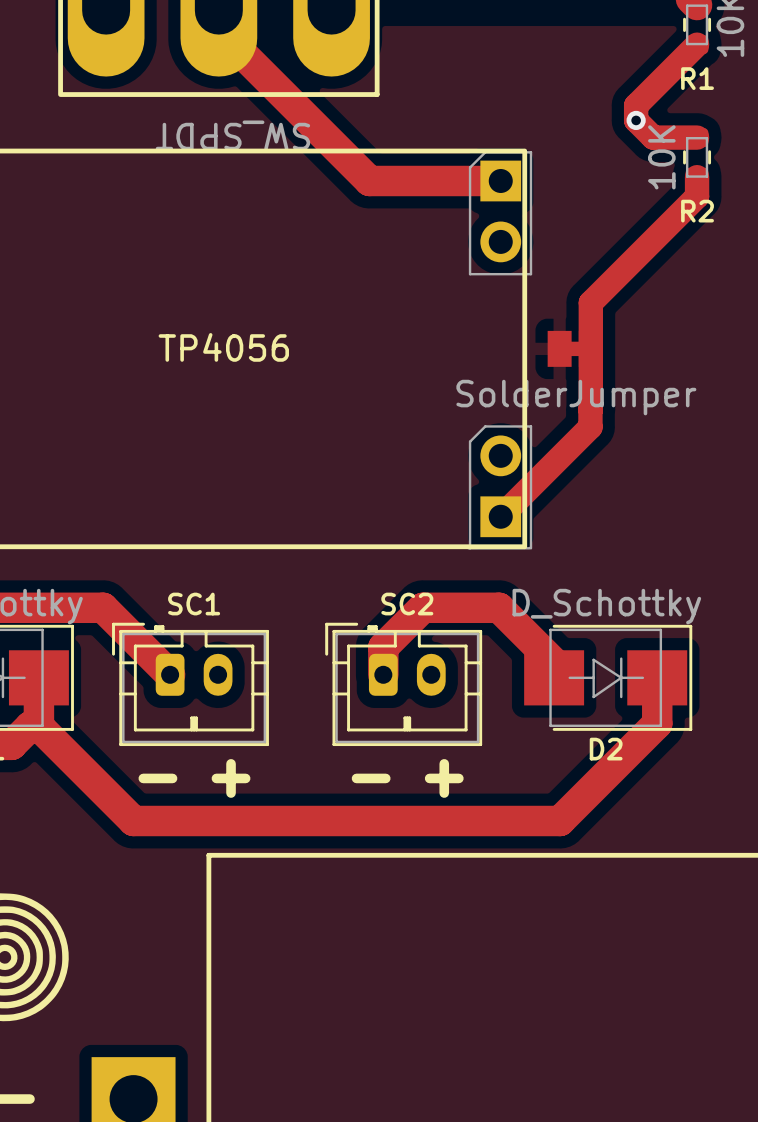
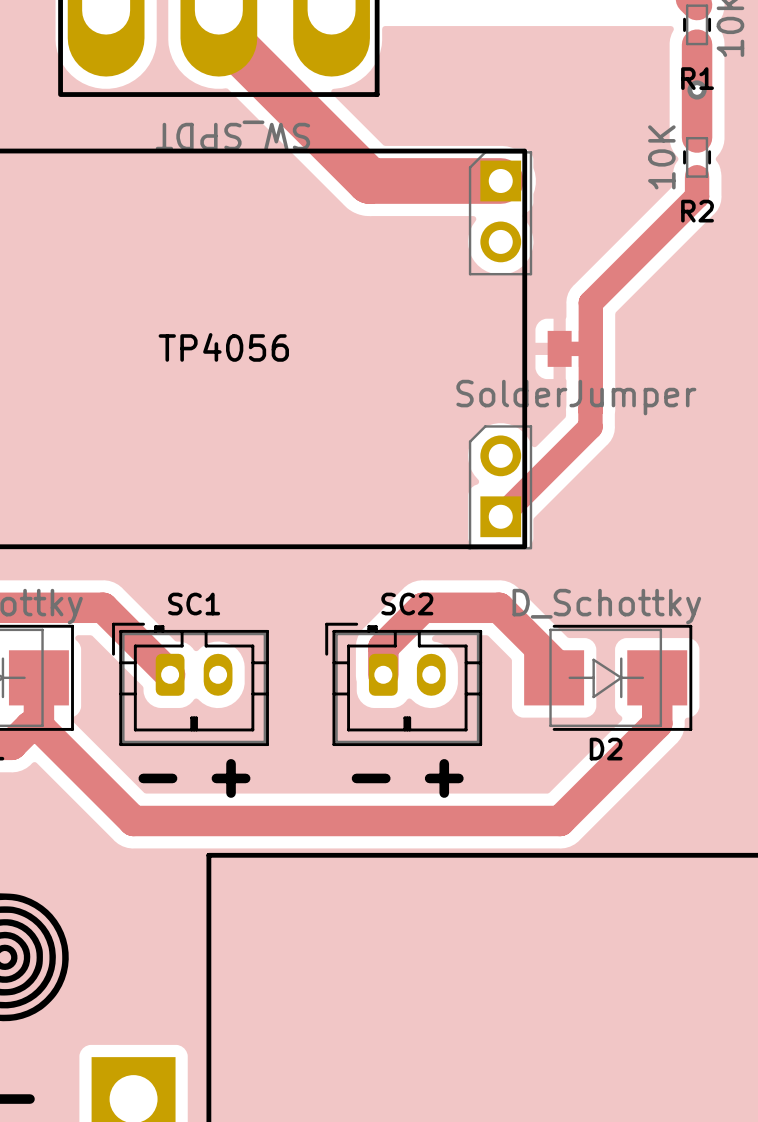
track width: thin (218, 30) (369, 181) (500, 181) -> thick (218, 30) (369, 181) (500, 181)
track: (697, 44) (636, 105) (636, 120) (653, 137) (697, 137) -> (697, 44) (697, 137)
via position: (636, 120) -> (697, 89)

